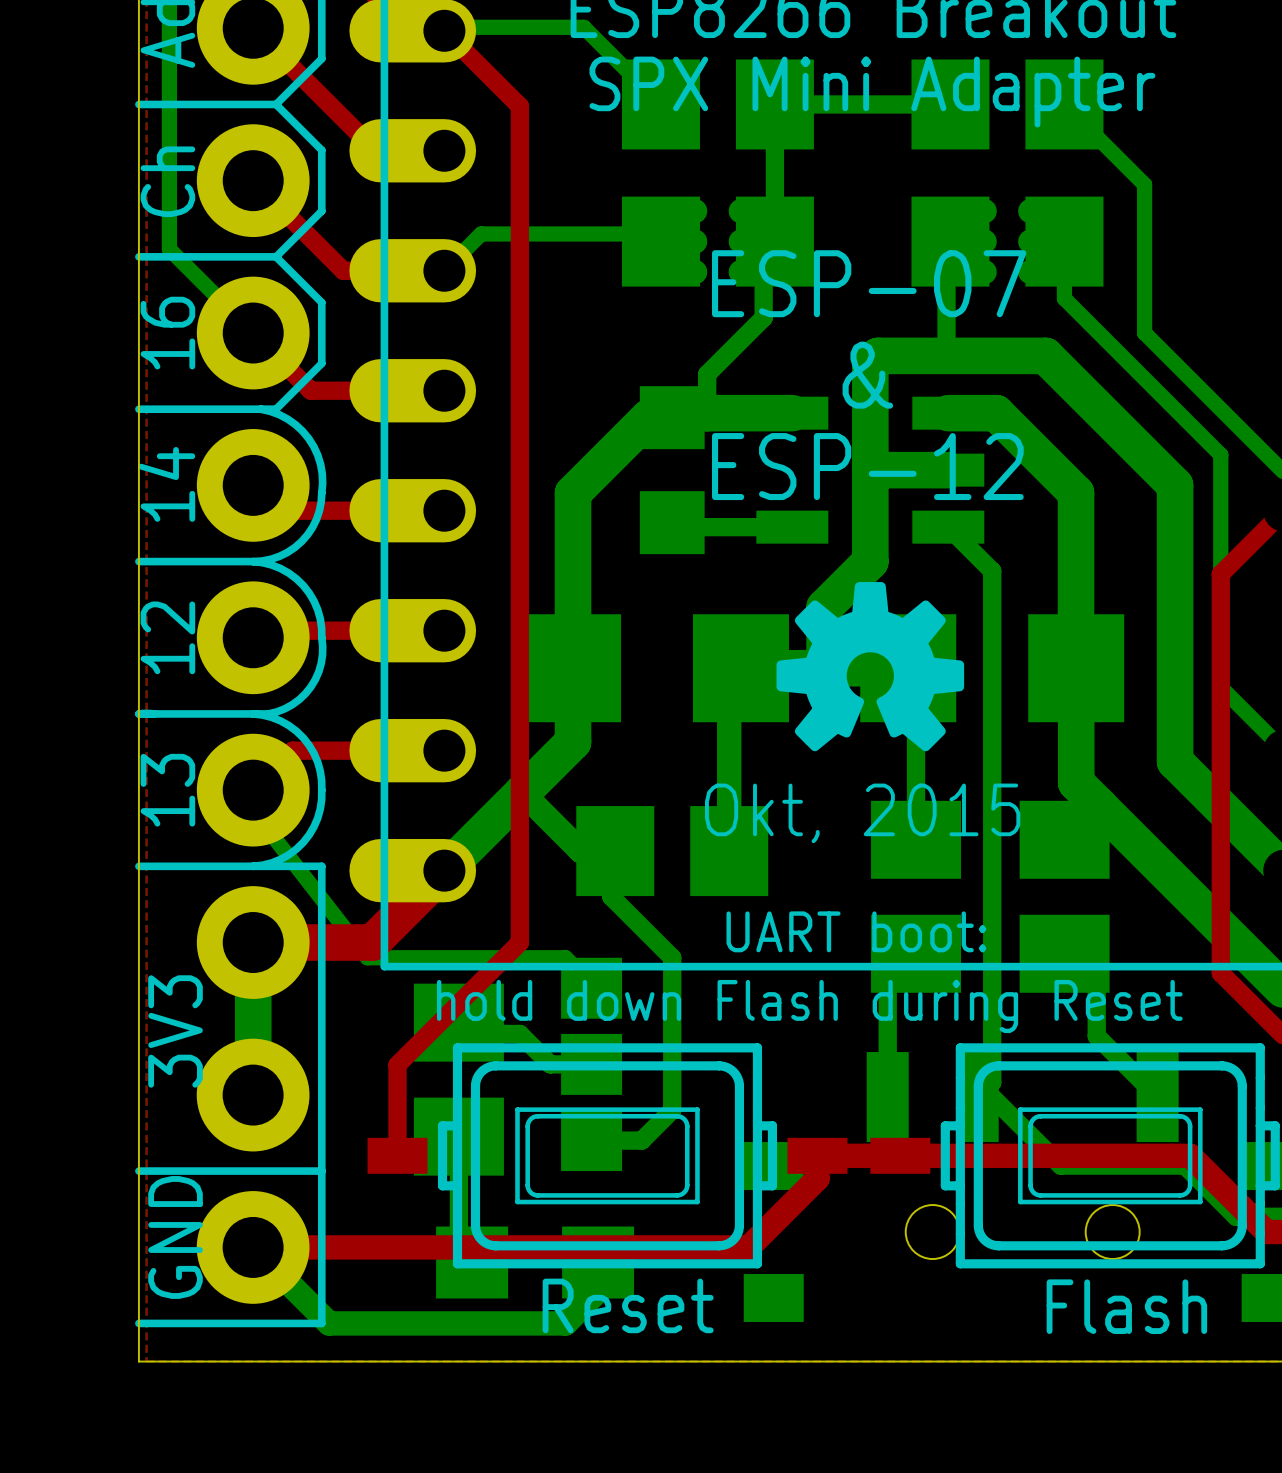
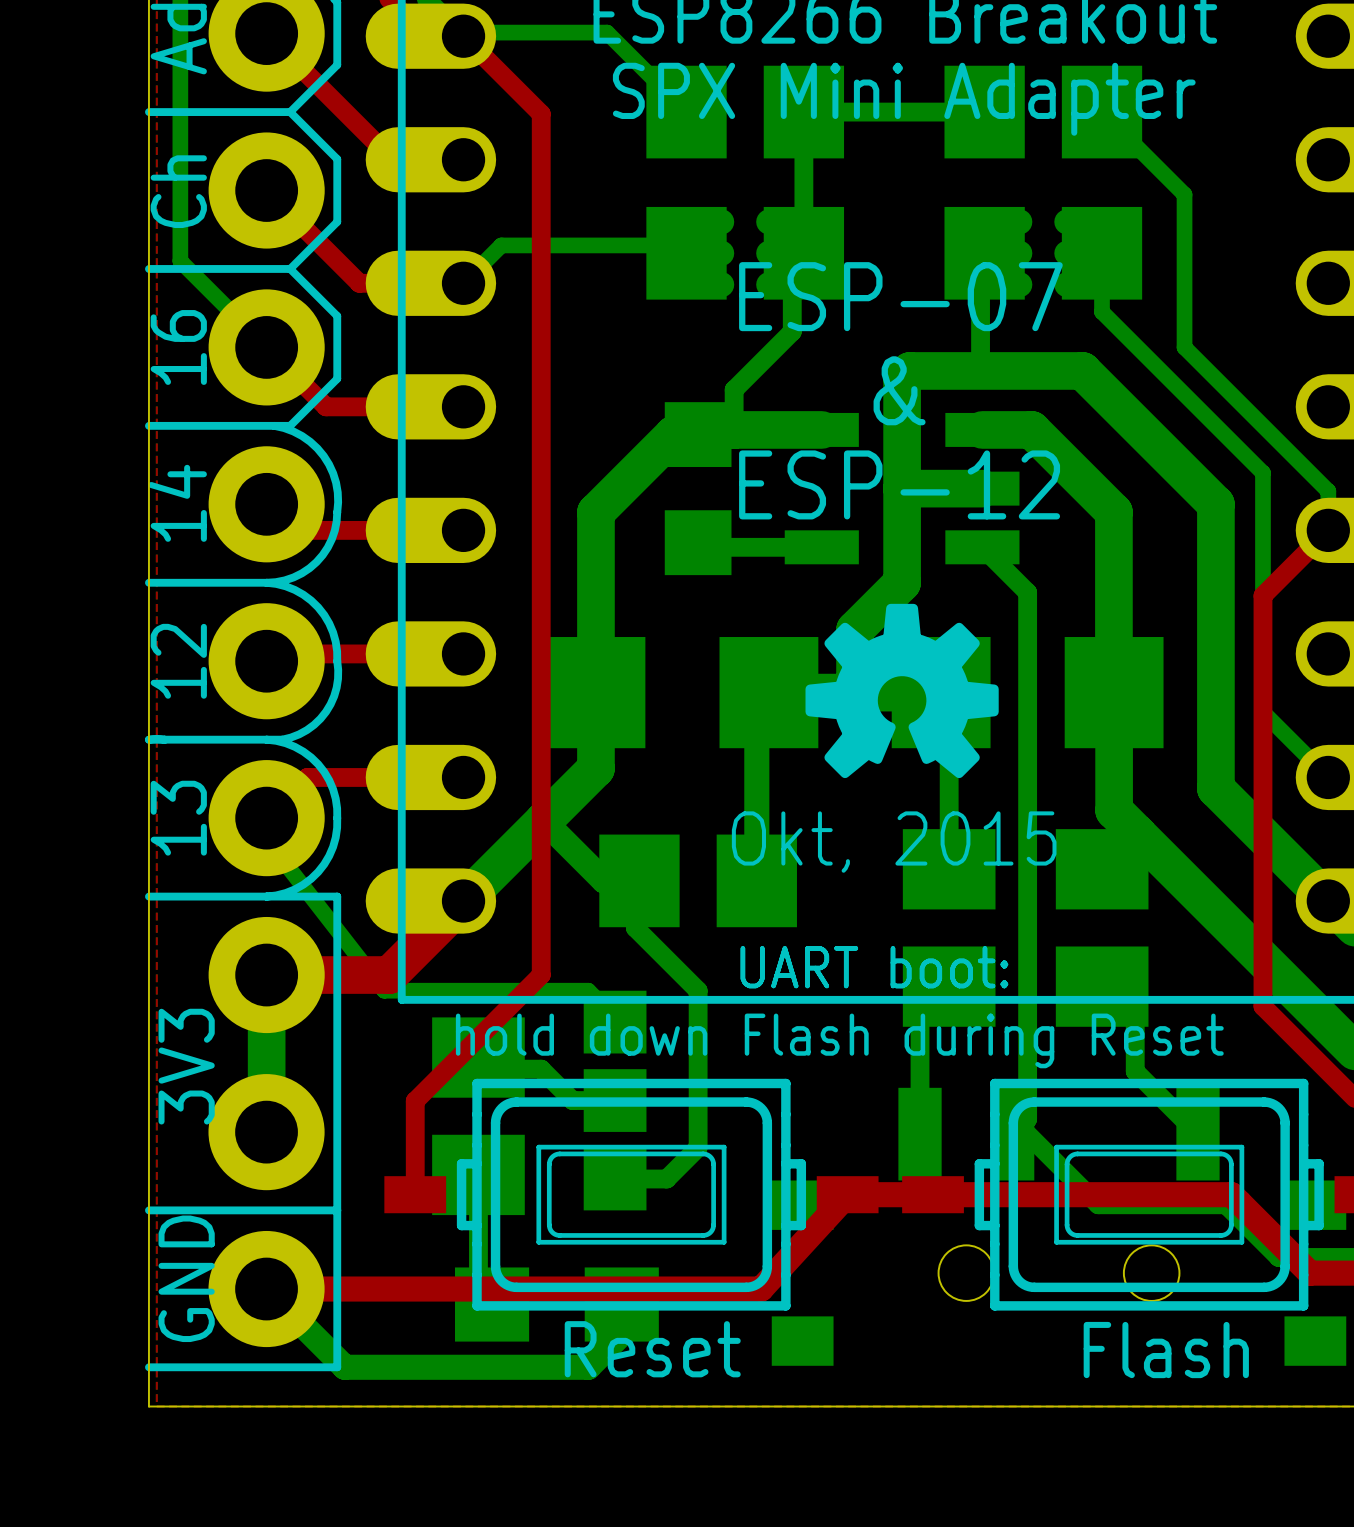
text position: UART boot: (856, 931) -> UART boot: (874, 967)
top track: (817, 1155) (817, 1178) (748, 1247) (733, 1247) -> (847, 1194) (761, 1289)

